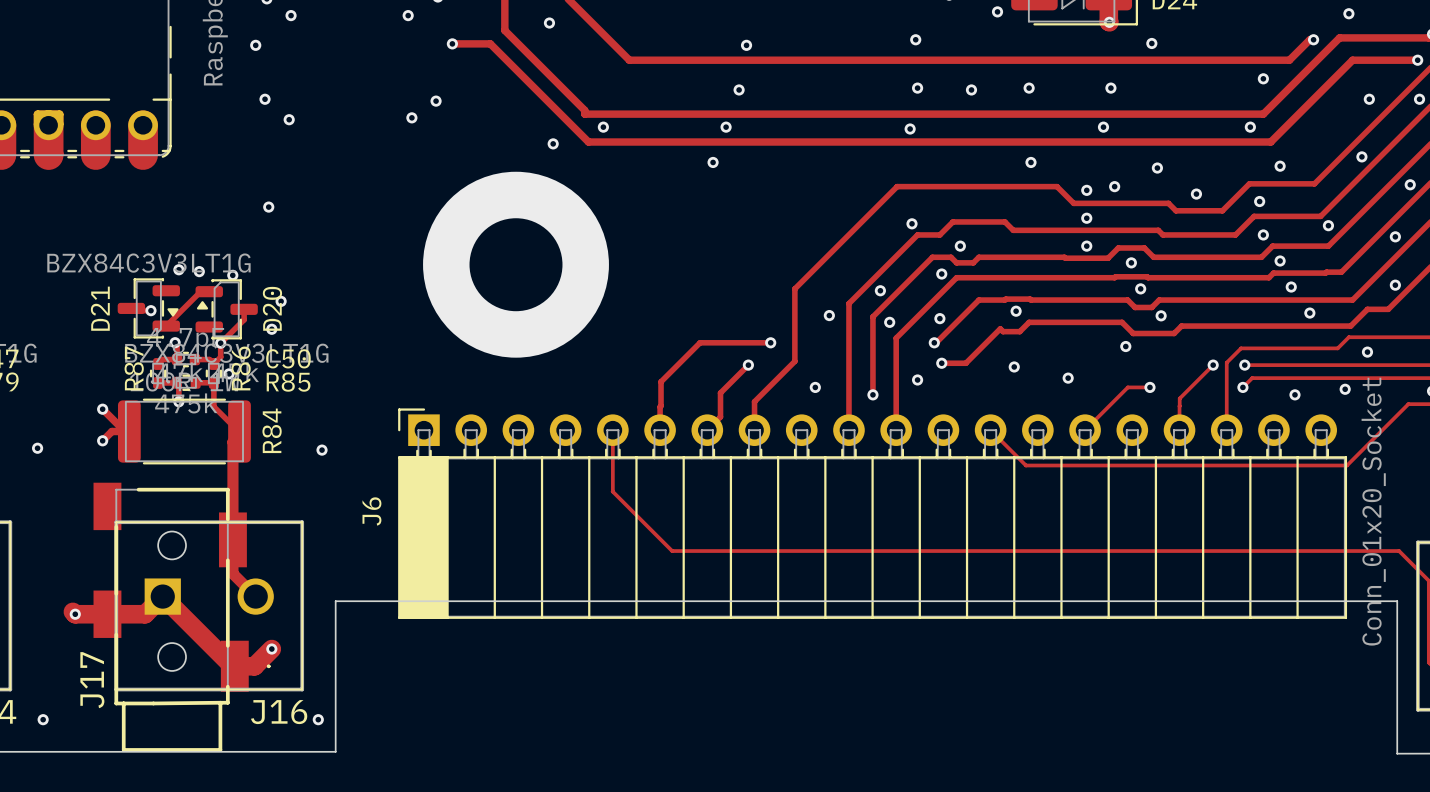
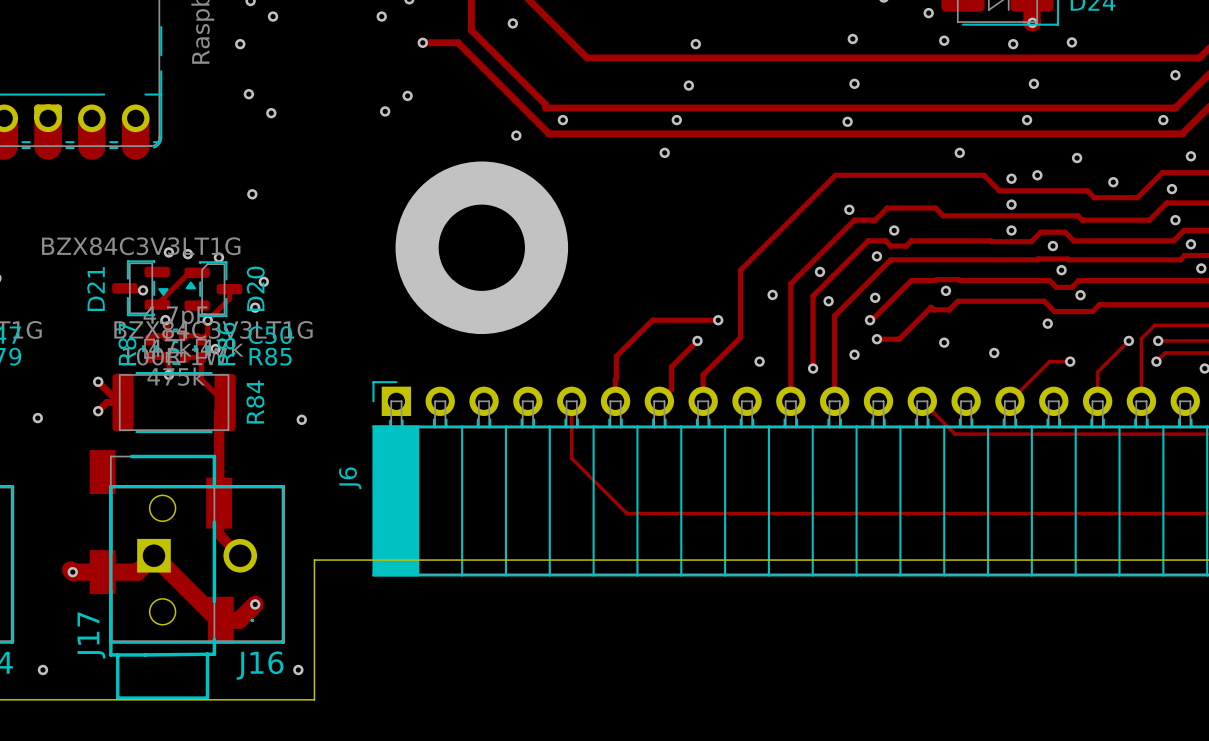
via: none -> (944, 40)
via: none -> (1013, 44)
via: (1029, 88) -> none
via: (971, 89) -> none

